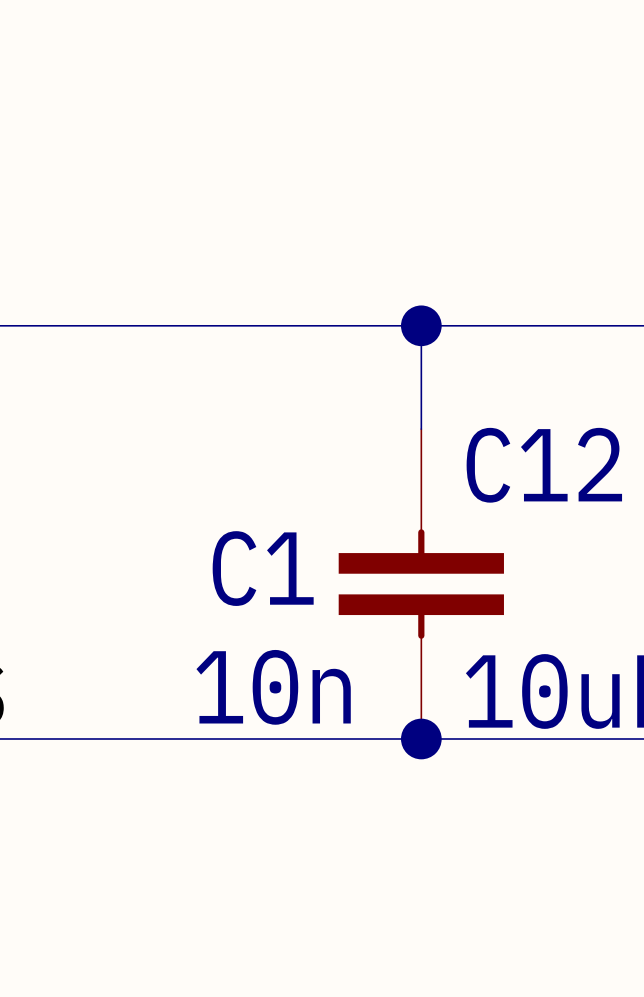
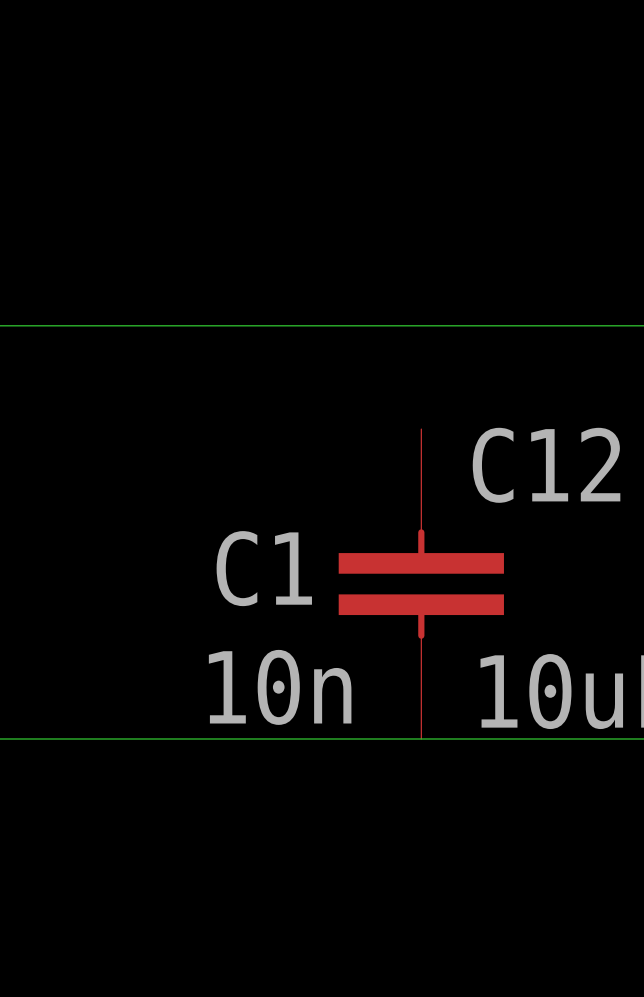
wire: (421, 325) (421, 429) -> none
junction: (421, 325) -> none
junction: (421, 738) -> none

